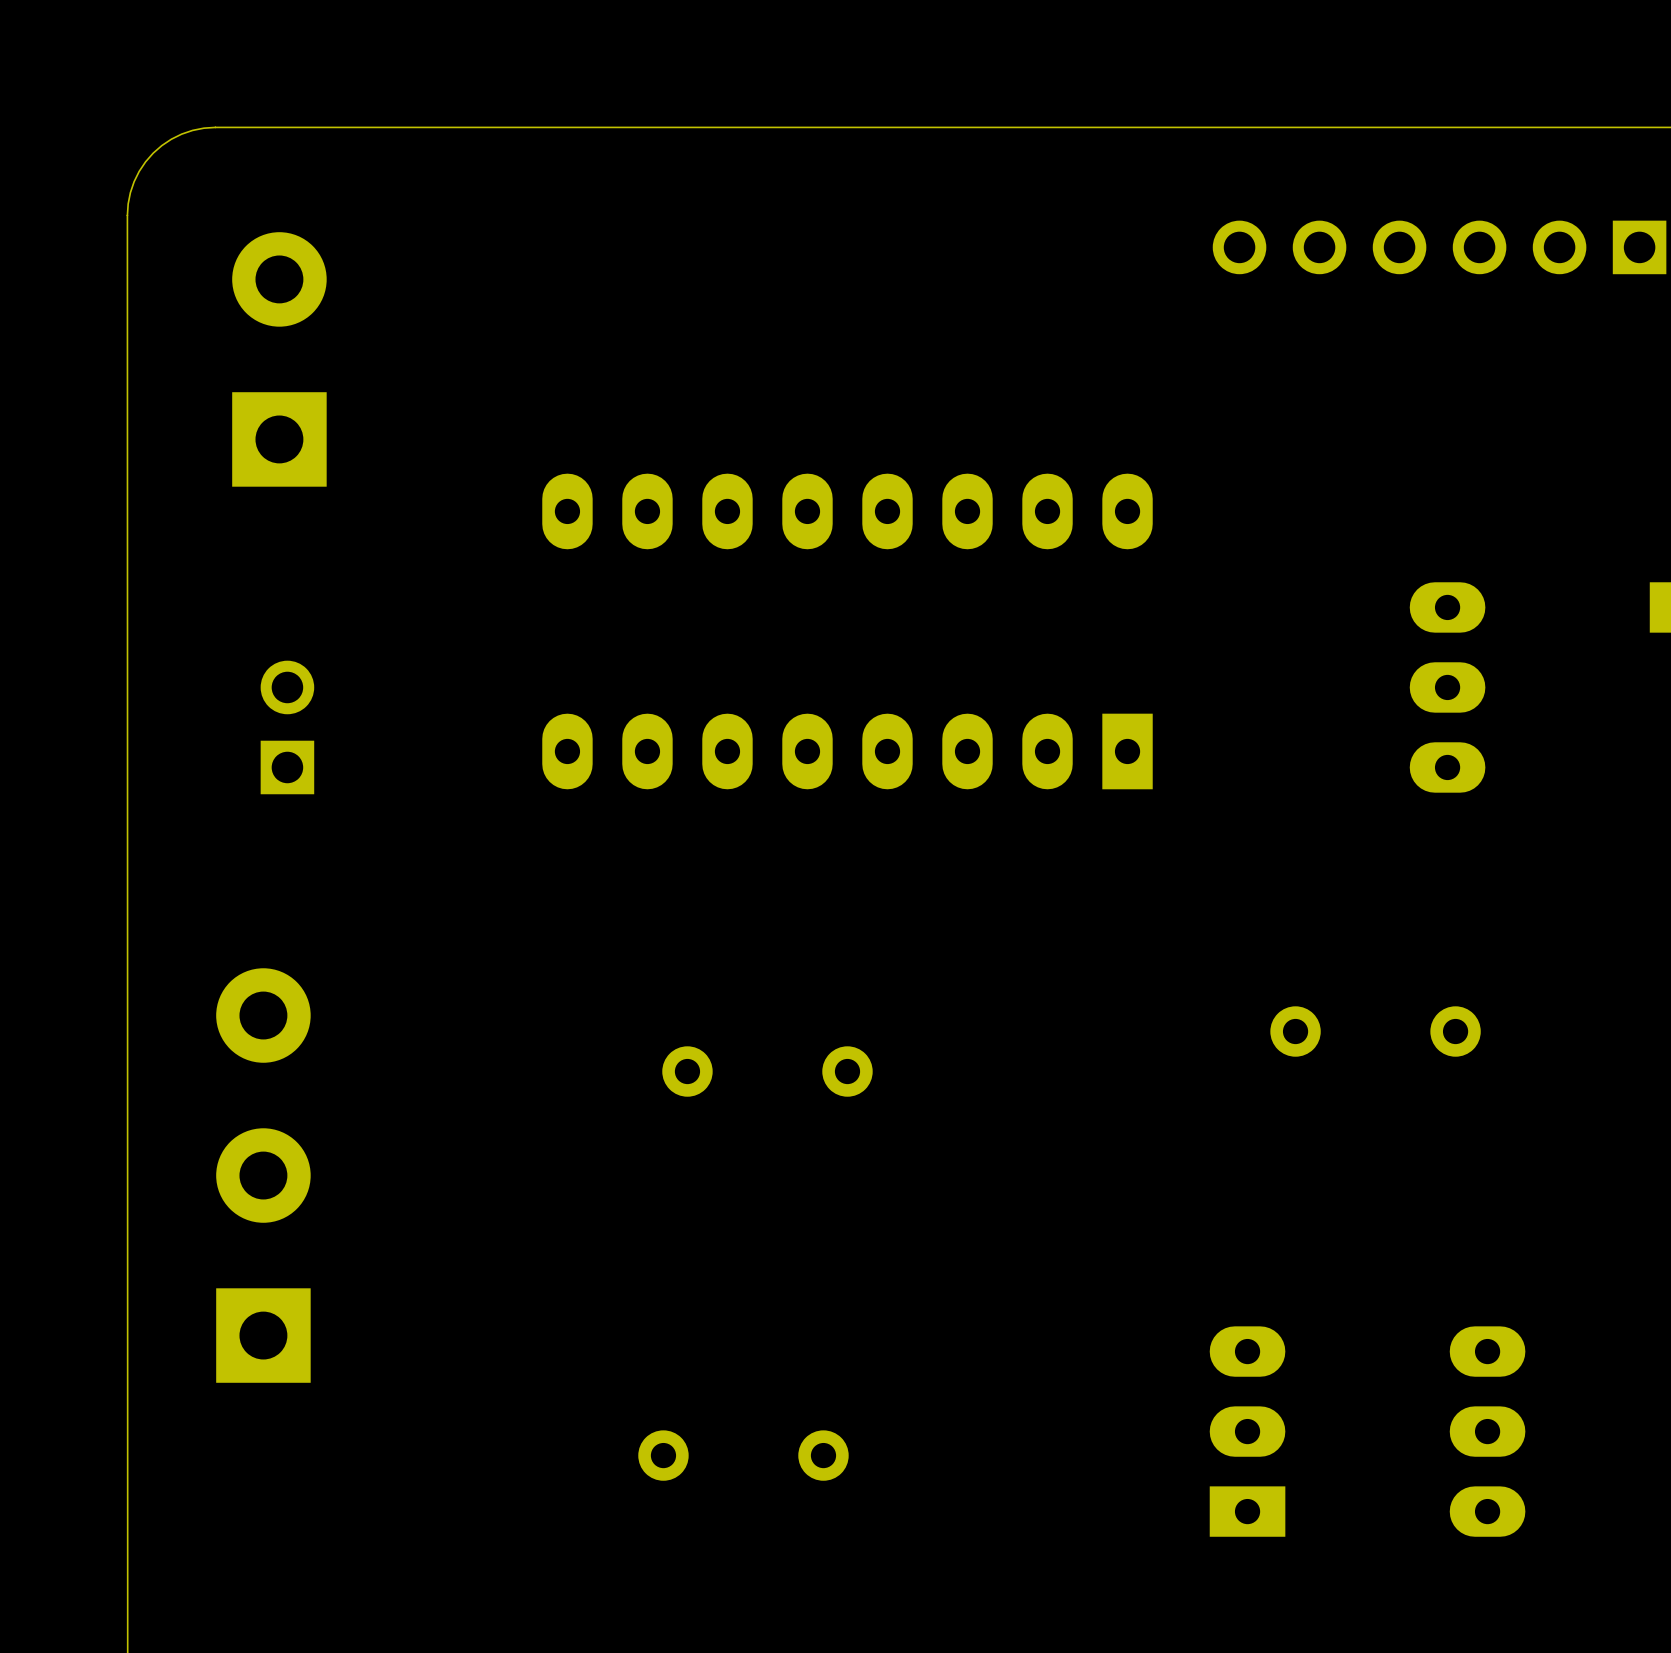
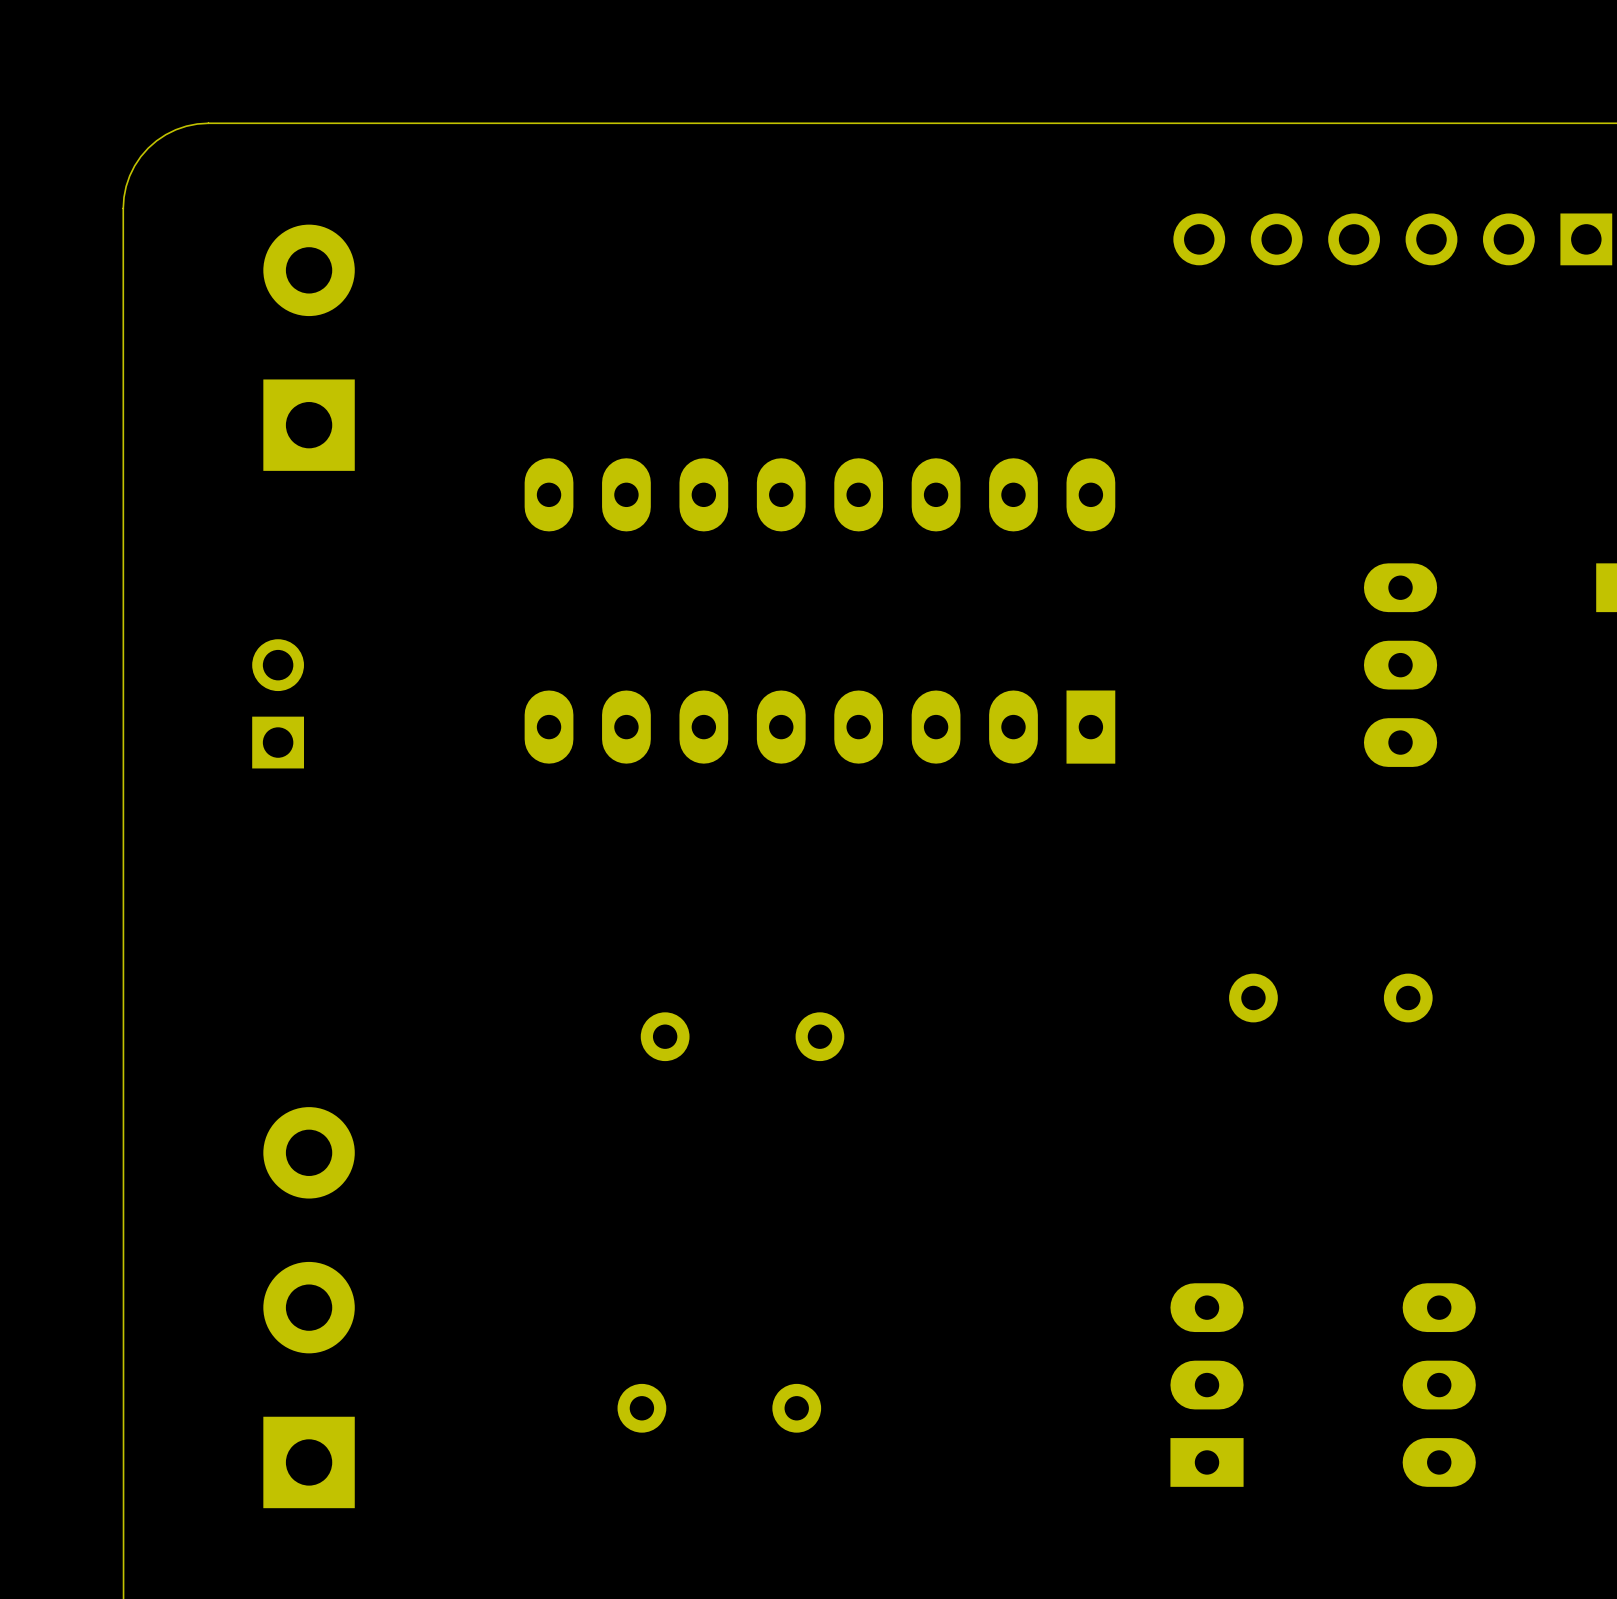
part position: (279, 359) -> (309, 347)
part position: (263, 1175) -> (309, 1307)

